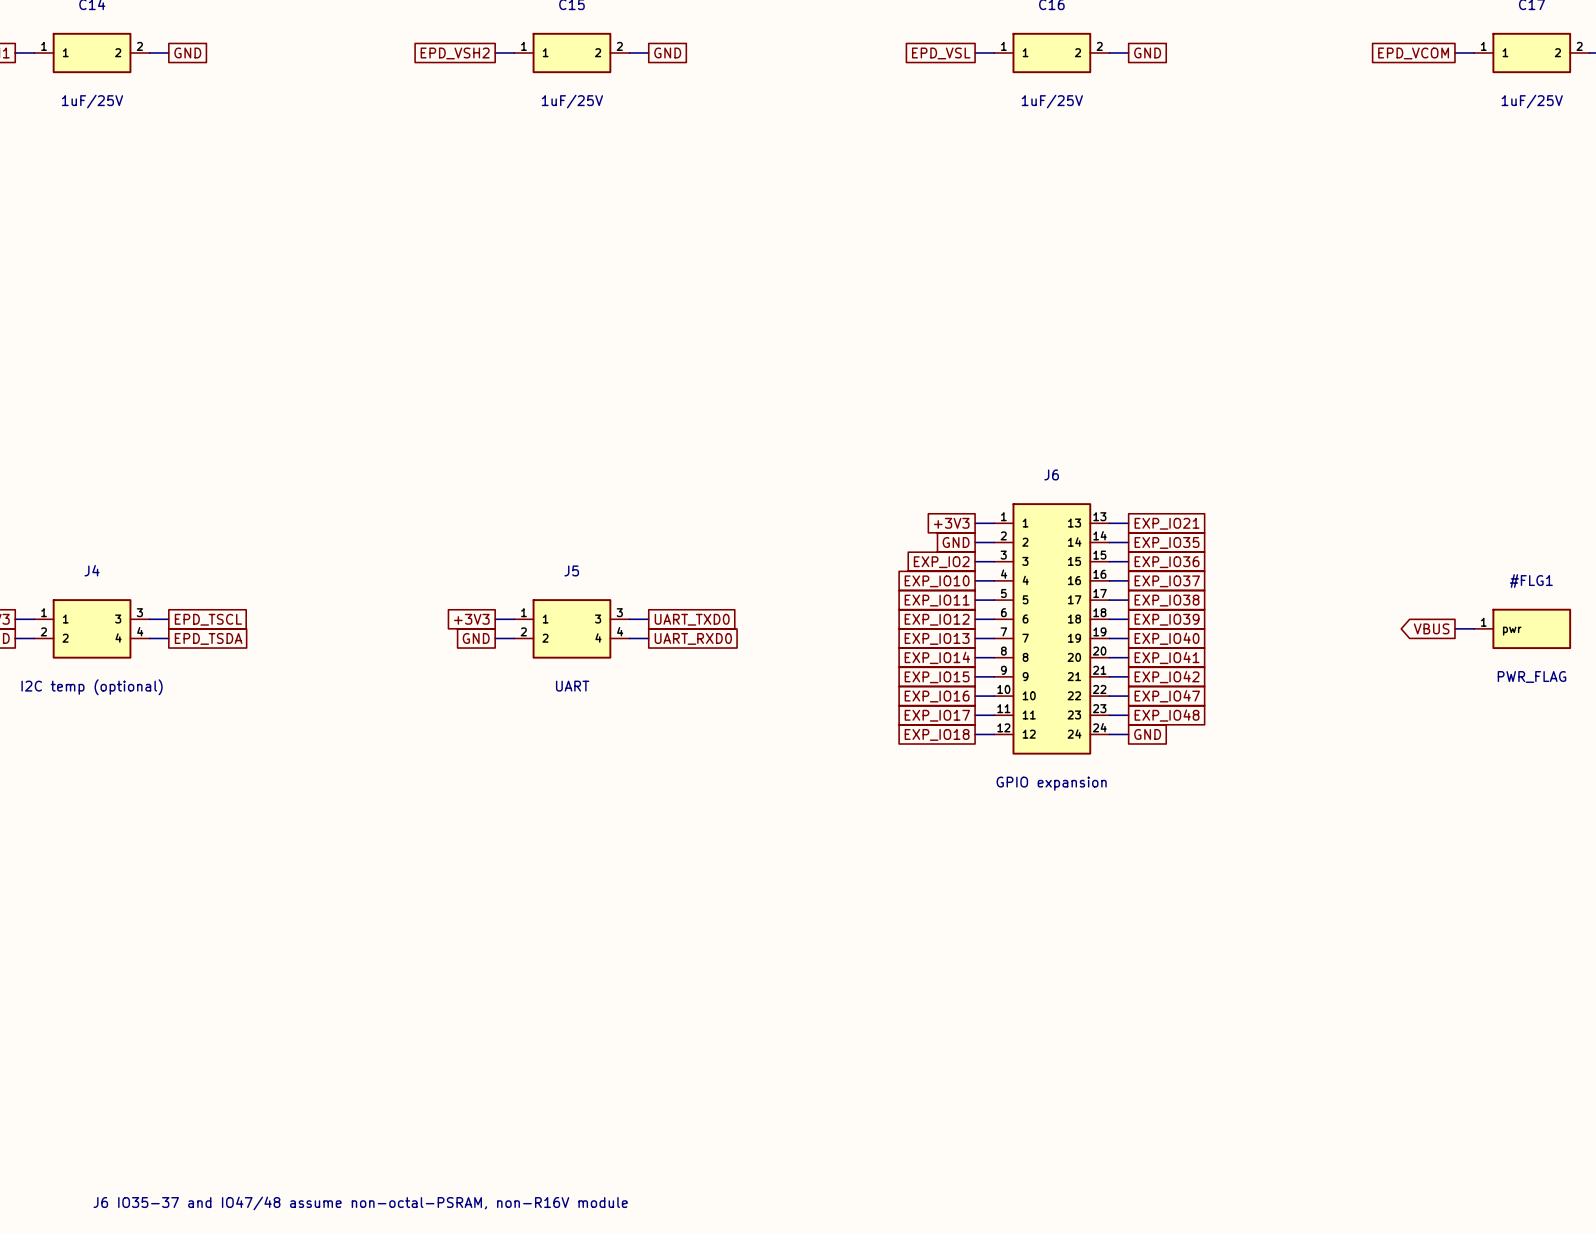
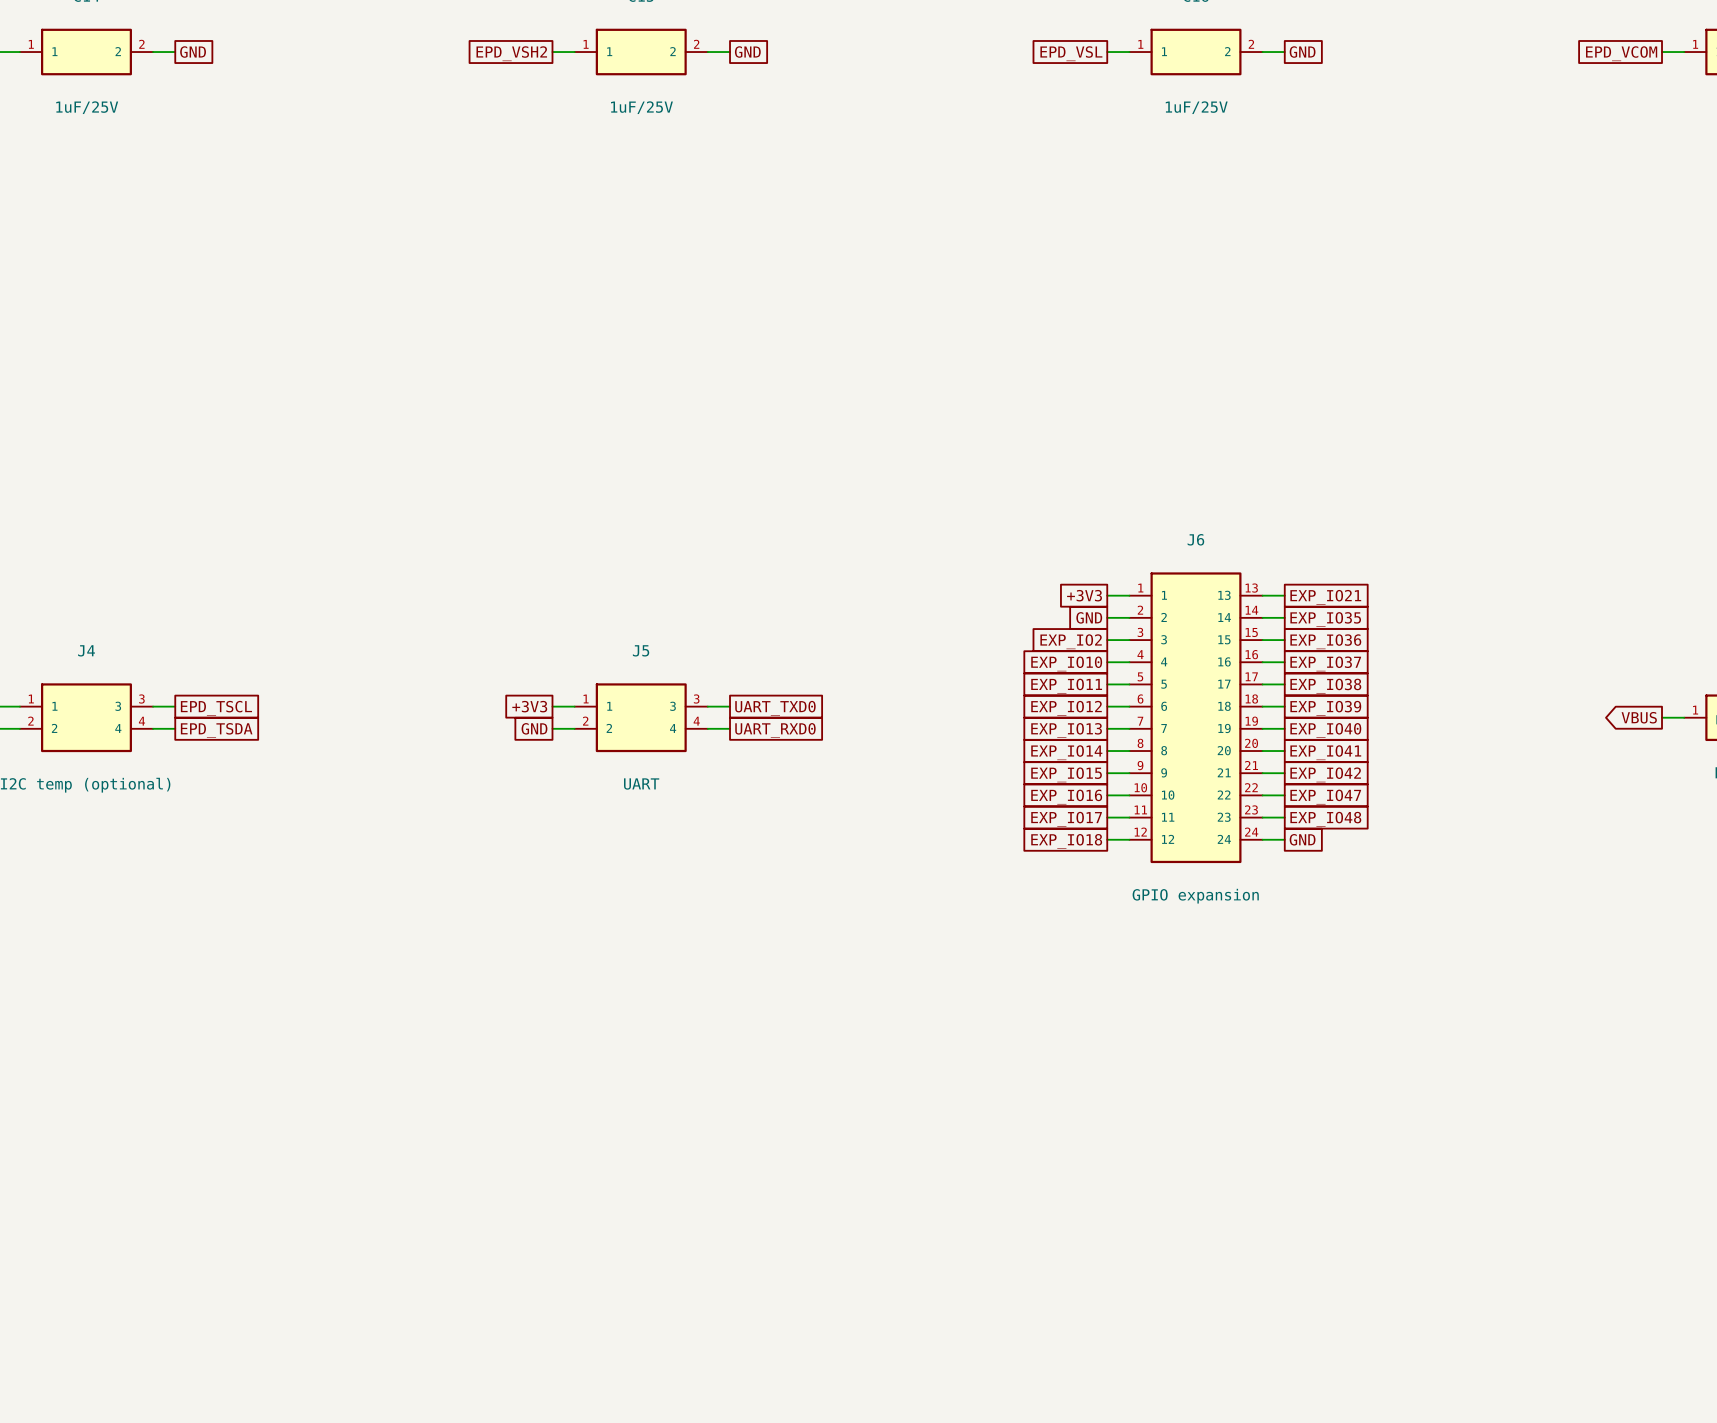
text: J6 IO35-37 and IO47/48 assume non-octal-PSRAM, non-R16V module (360, 1203) -> none

